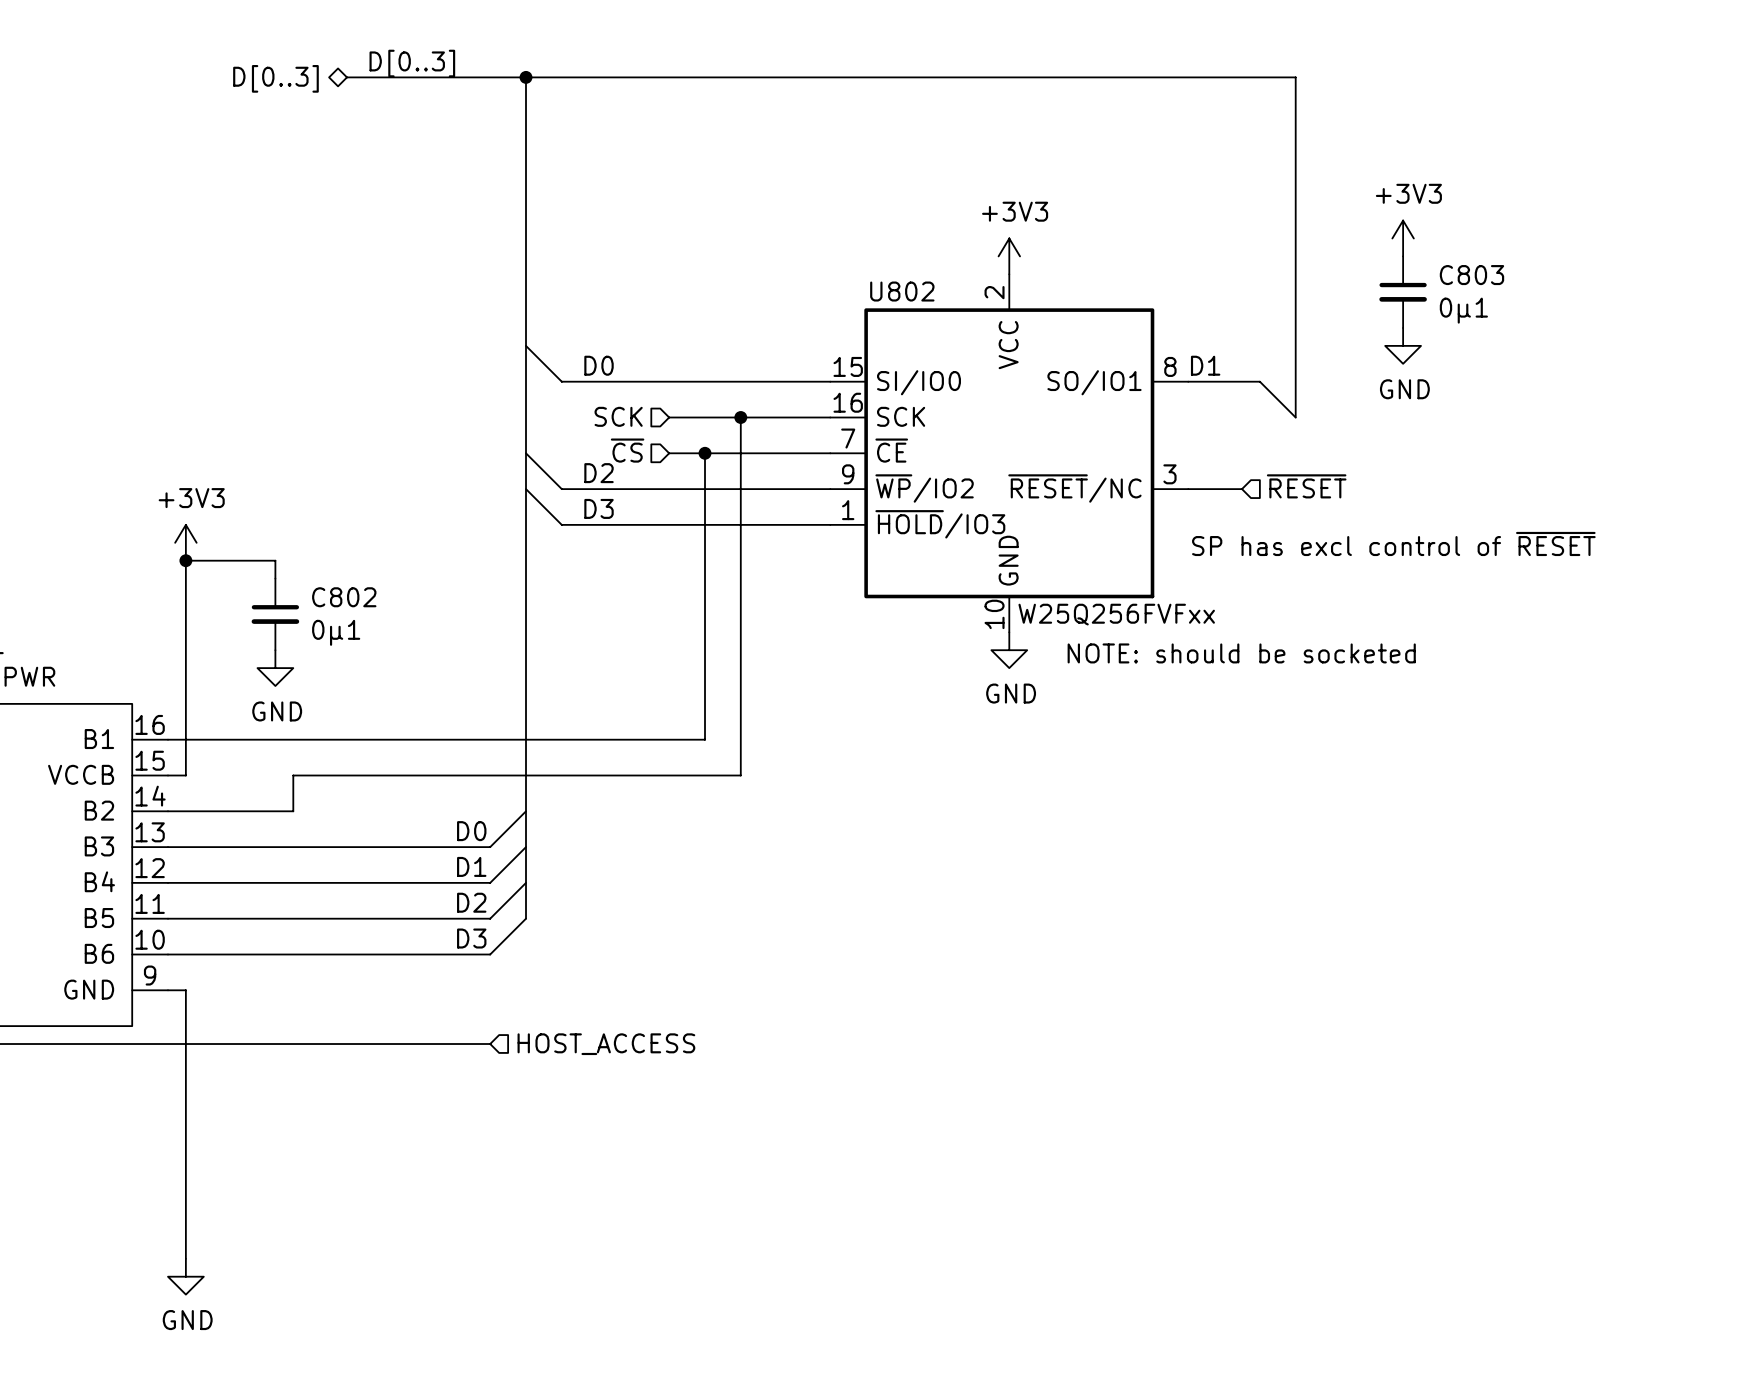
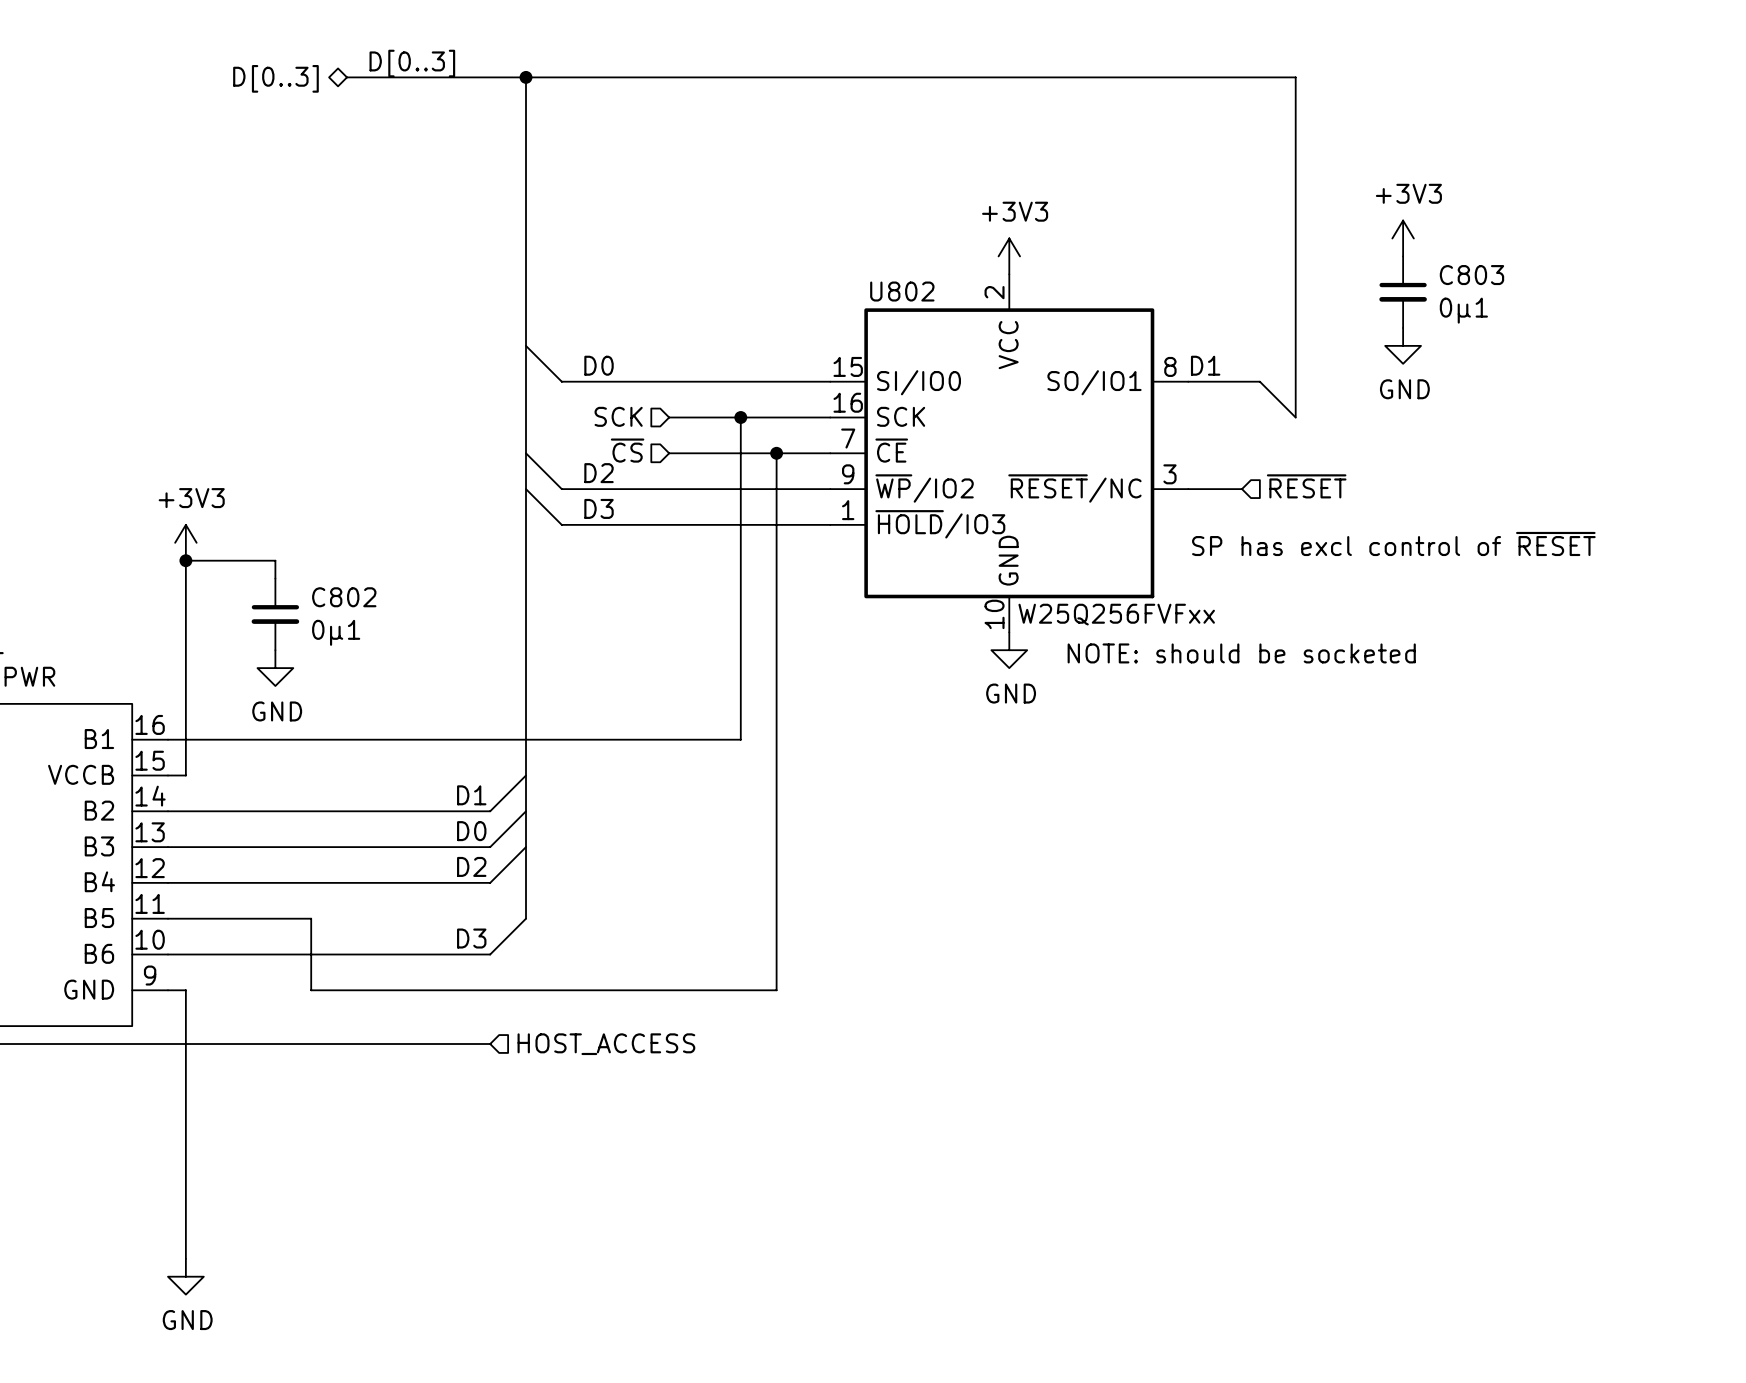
wire: (705, 453) (705, 739) -> (740, 739) (705, 739)
junction position: (705, 453) -> (776, 453)
wire: (740, 739) (740, 775) (293, 775) (293, 811) -> (526, 775) (490, 811) (293, 811)
label: none -> D1 (471, 795)
label: D1 (471, 866) -> D2 (471, 866)
wire: (526, 882) (490, 918) (311, 918) -> (776, 453) (776, 990) (311, 990) (311, 918)
label: D2 (471, 902) -> none

